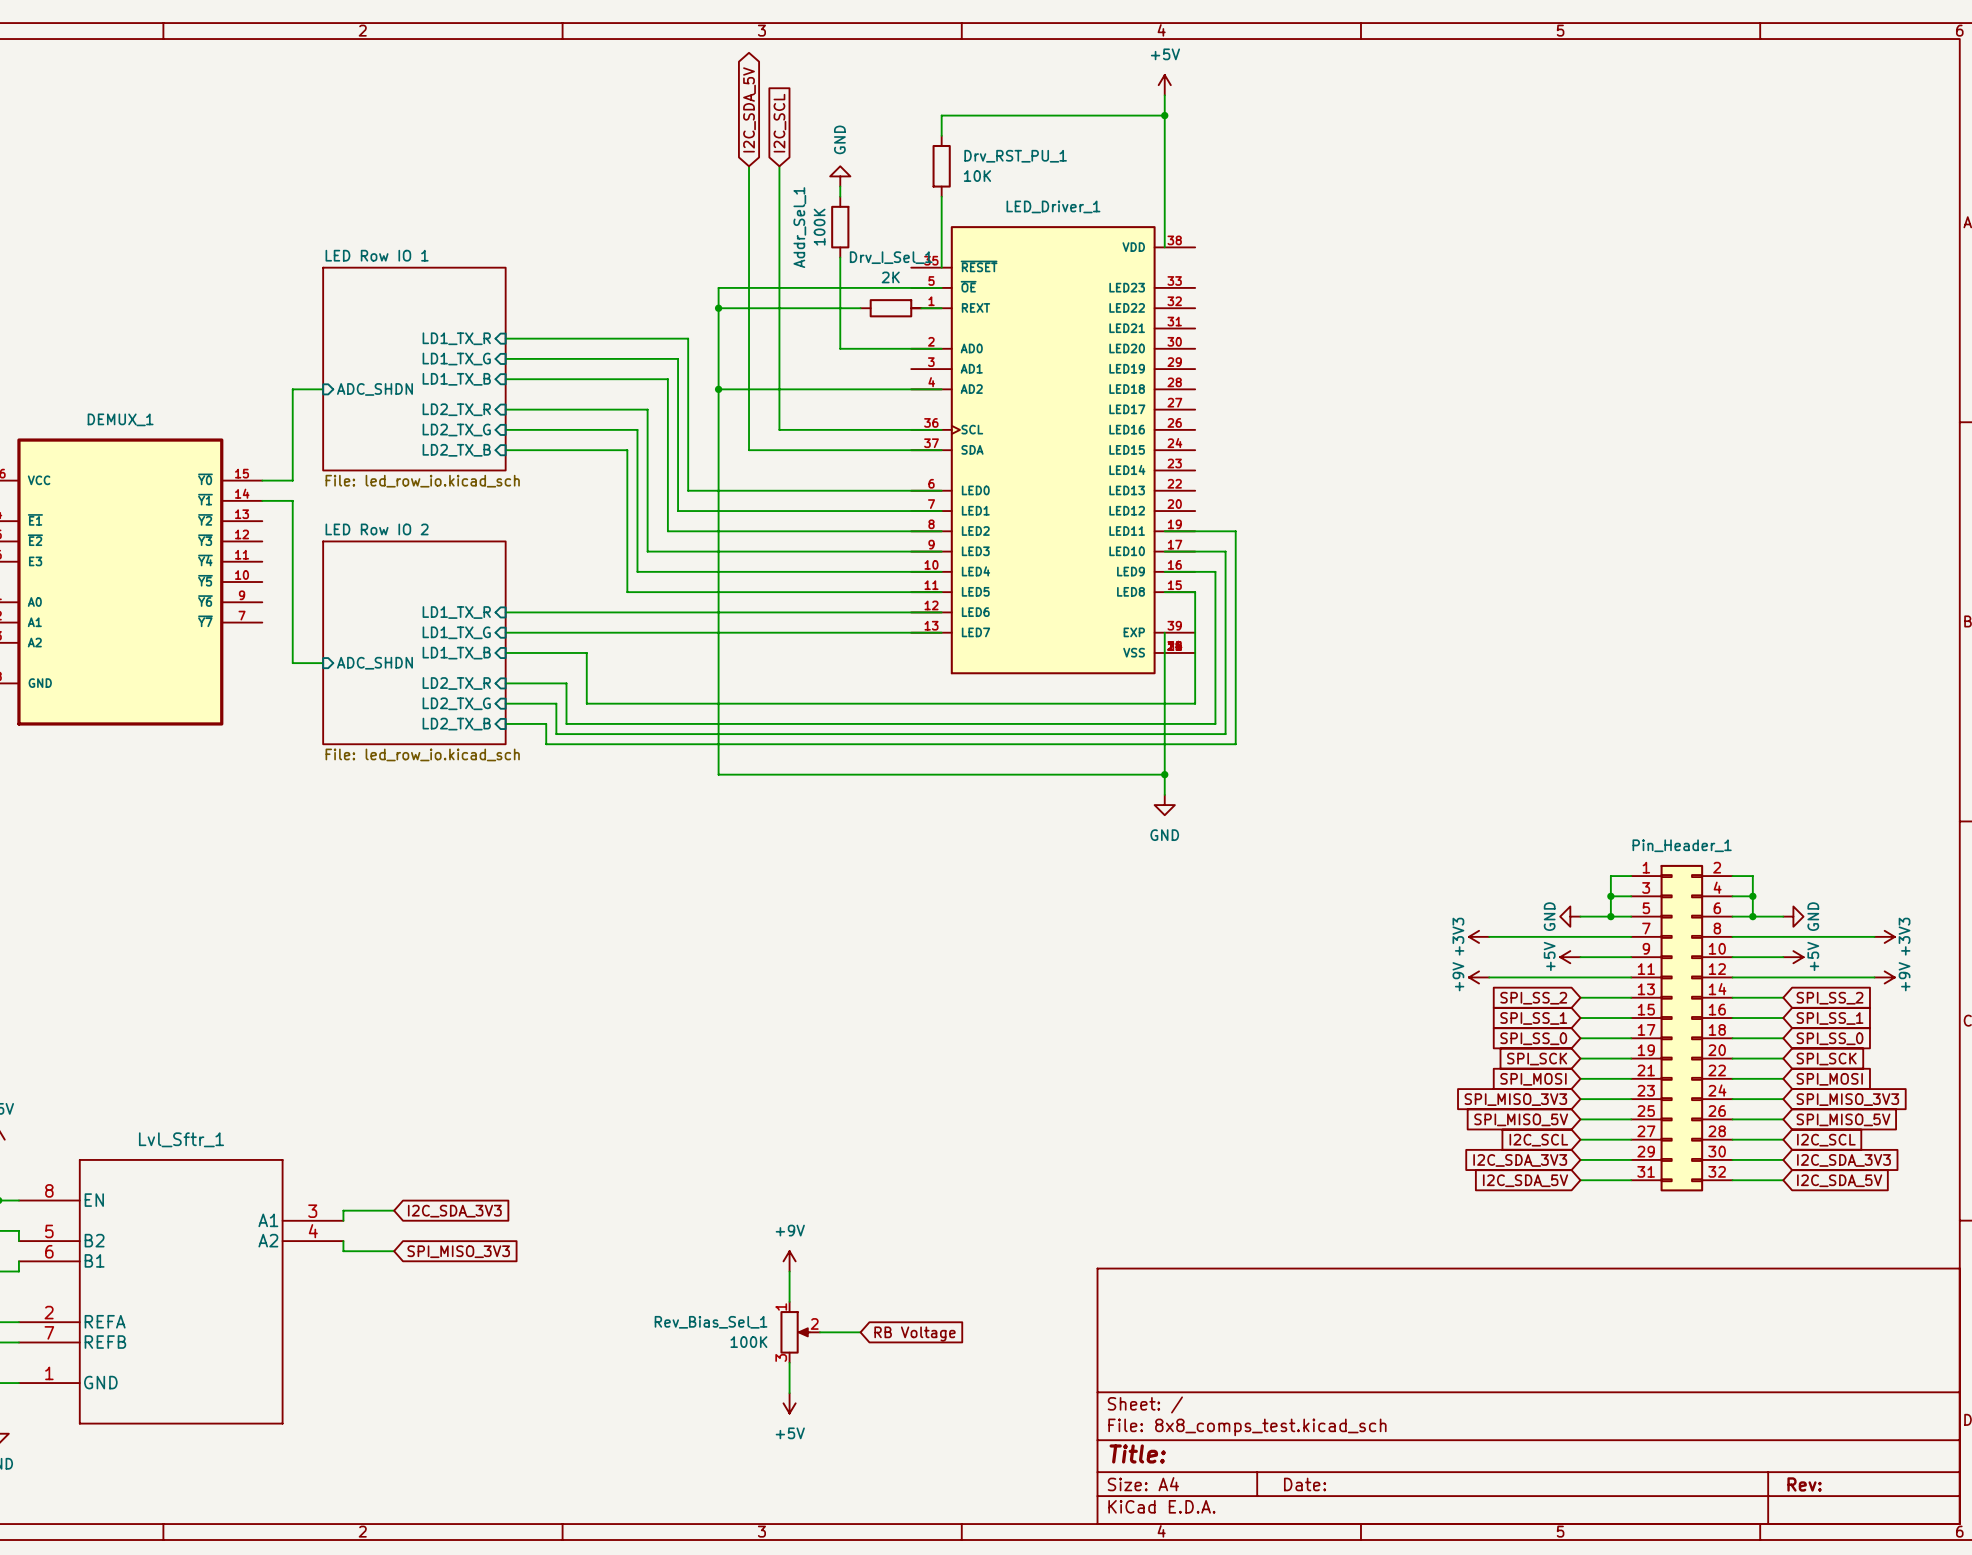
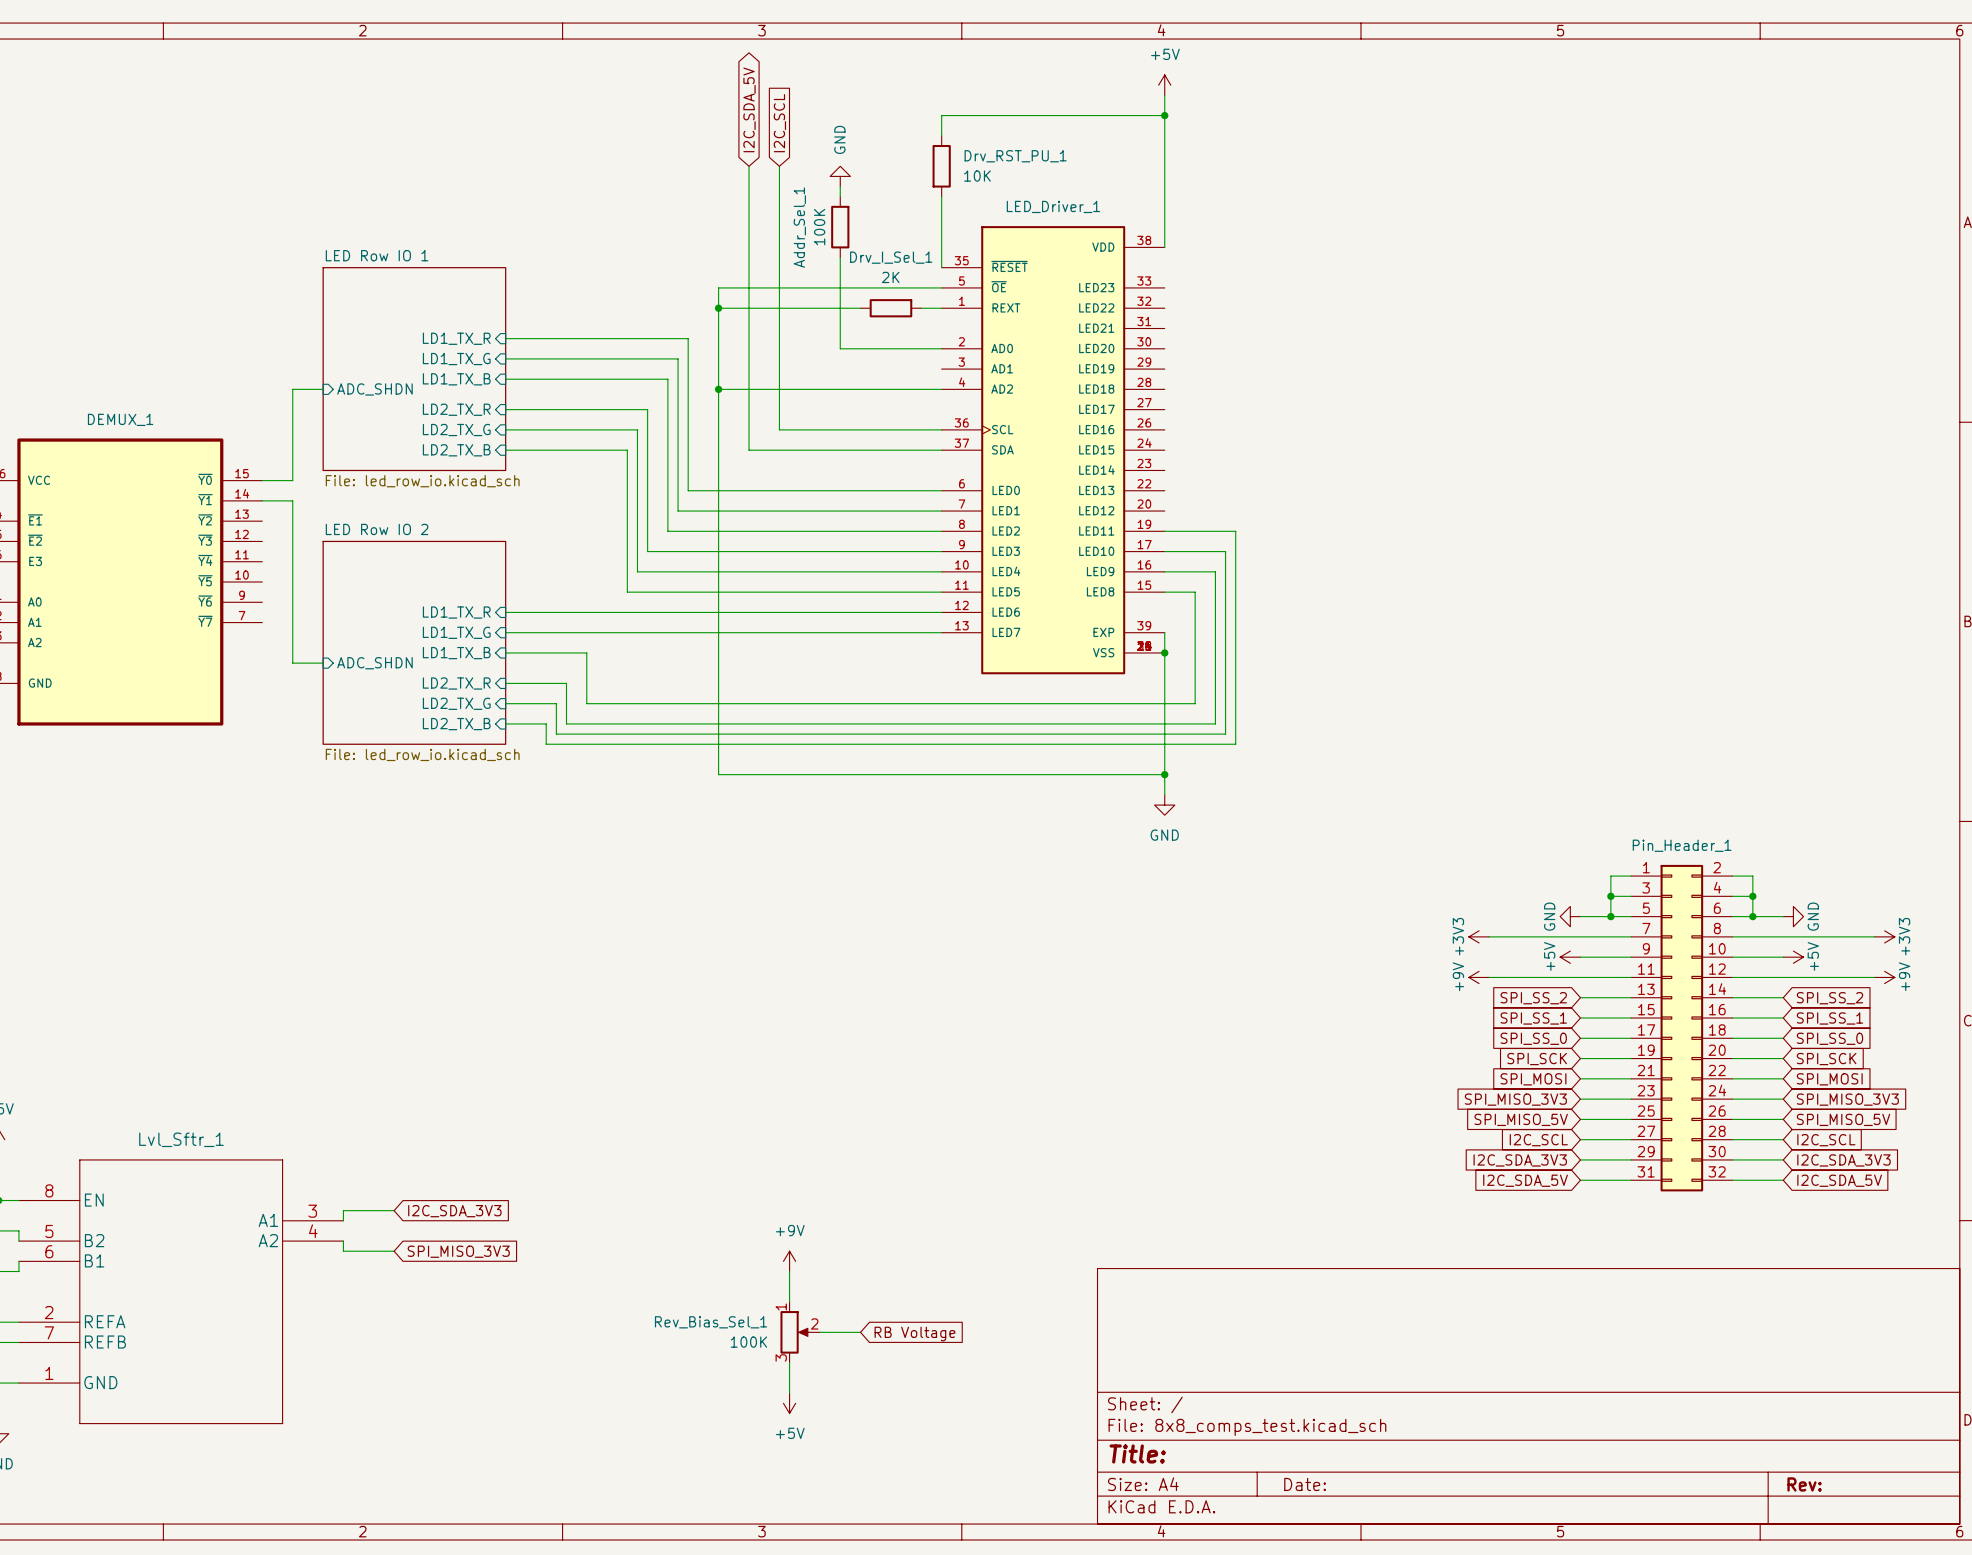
LED_Driver_1 symbol: [911, 226, 1196, 675] -> [941, 226, 1165, 675]
junction: none -> (1164, 652)

